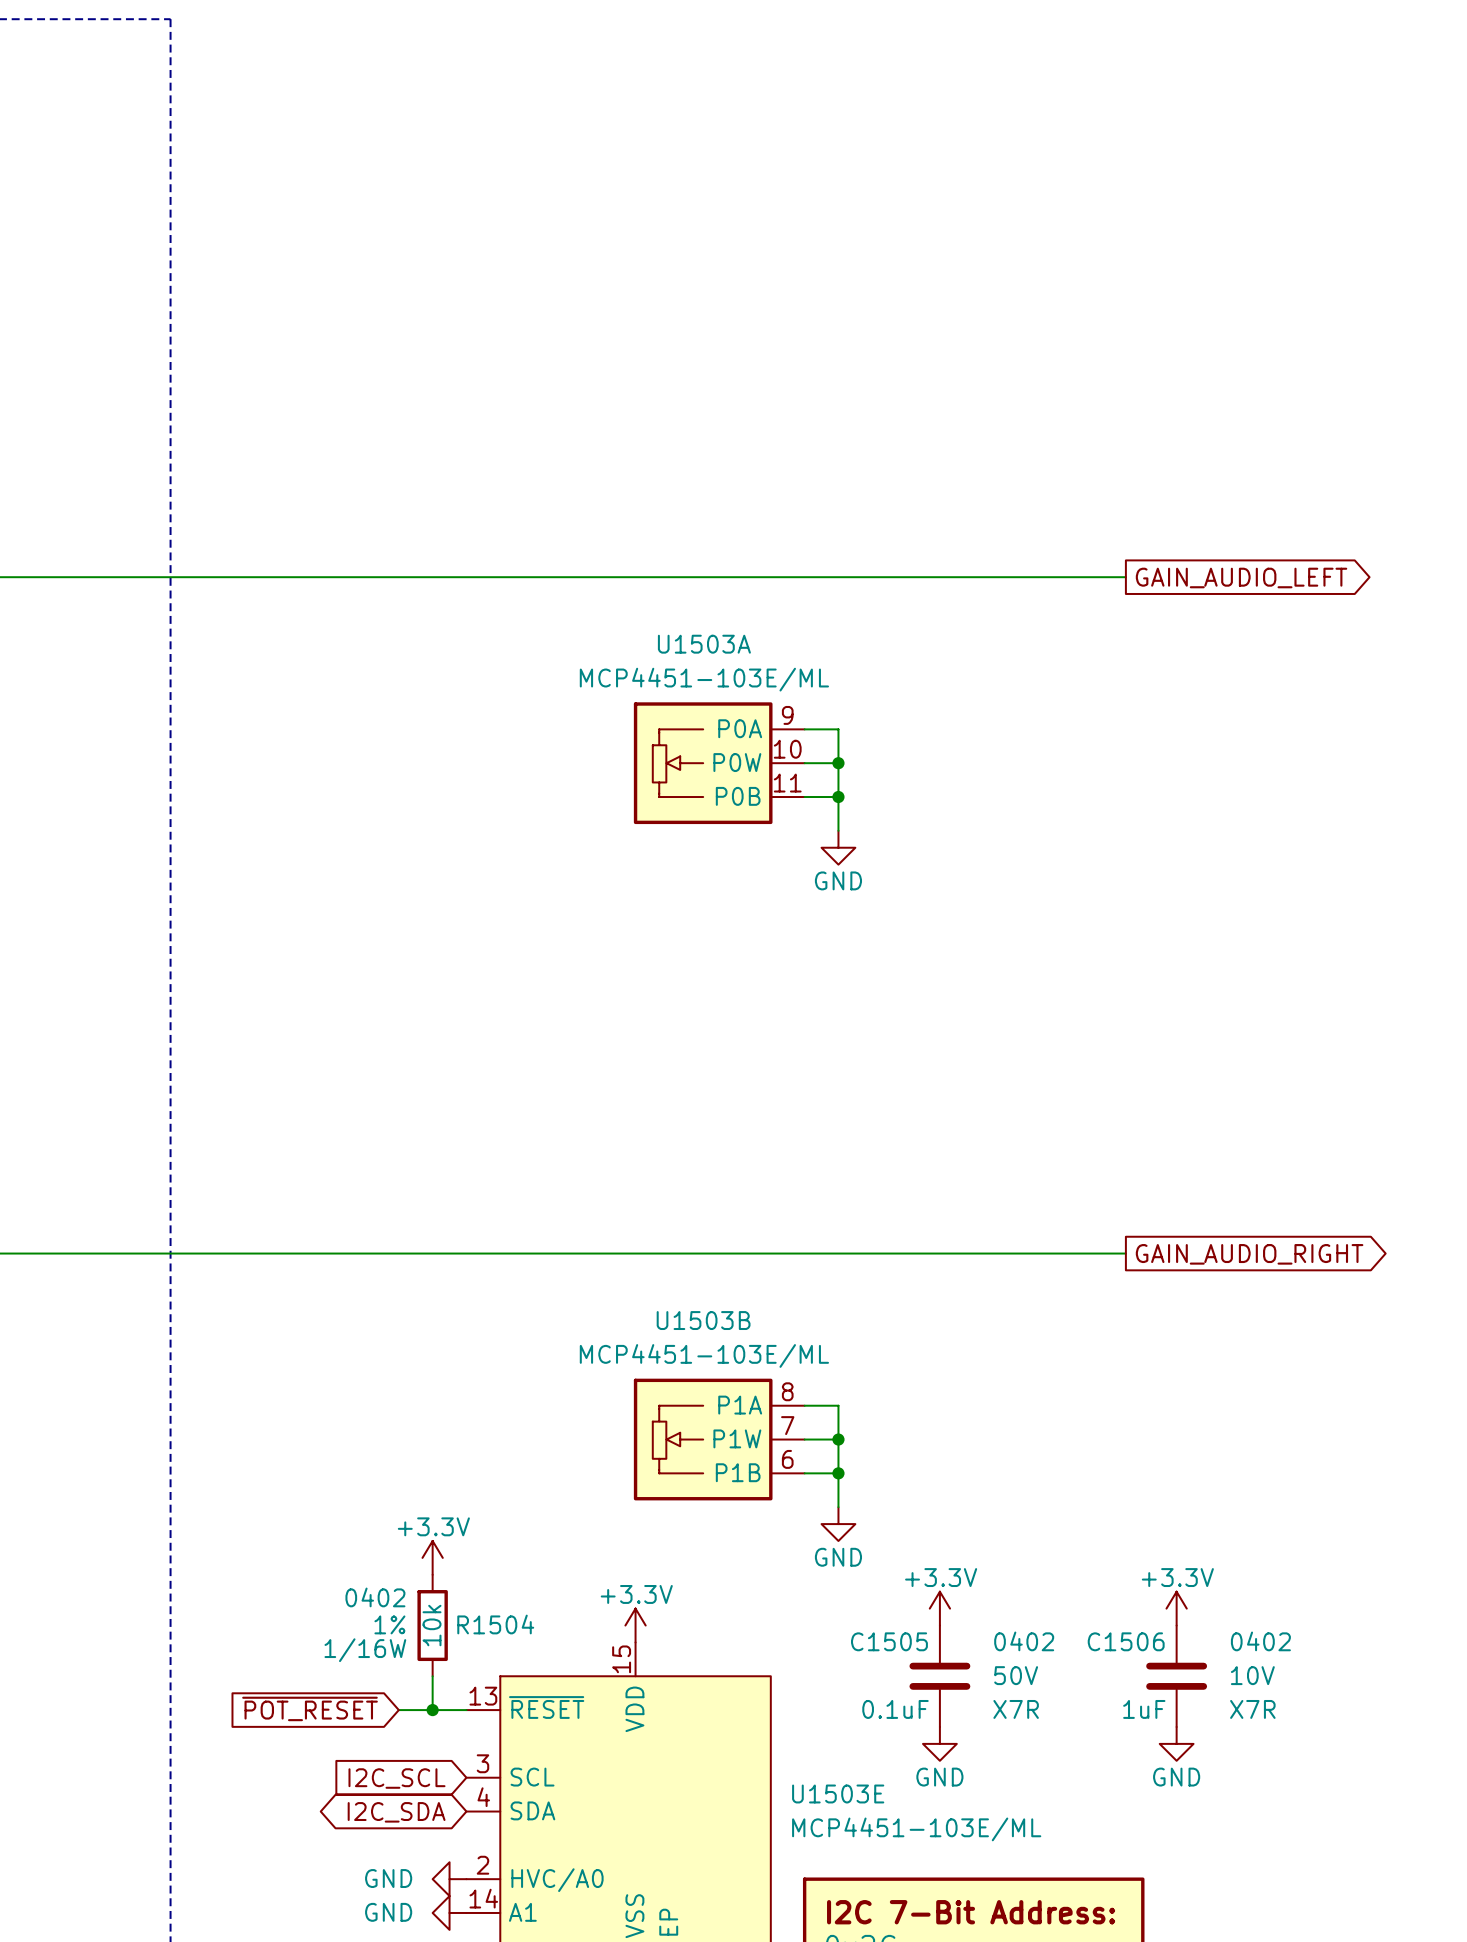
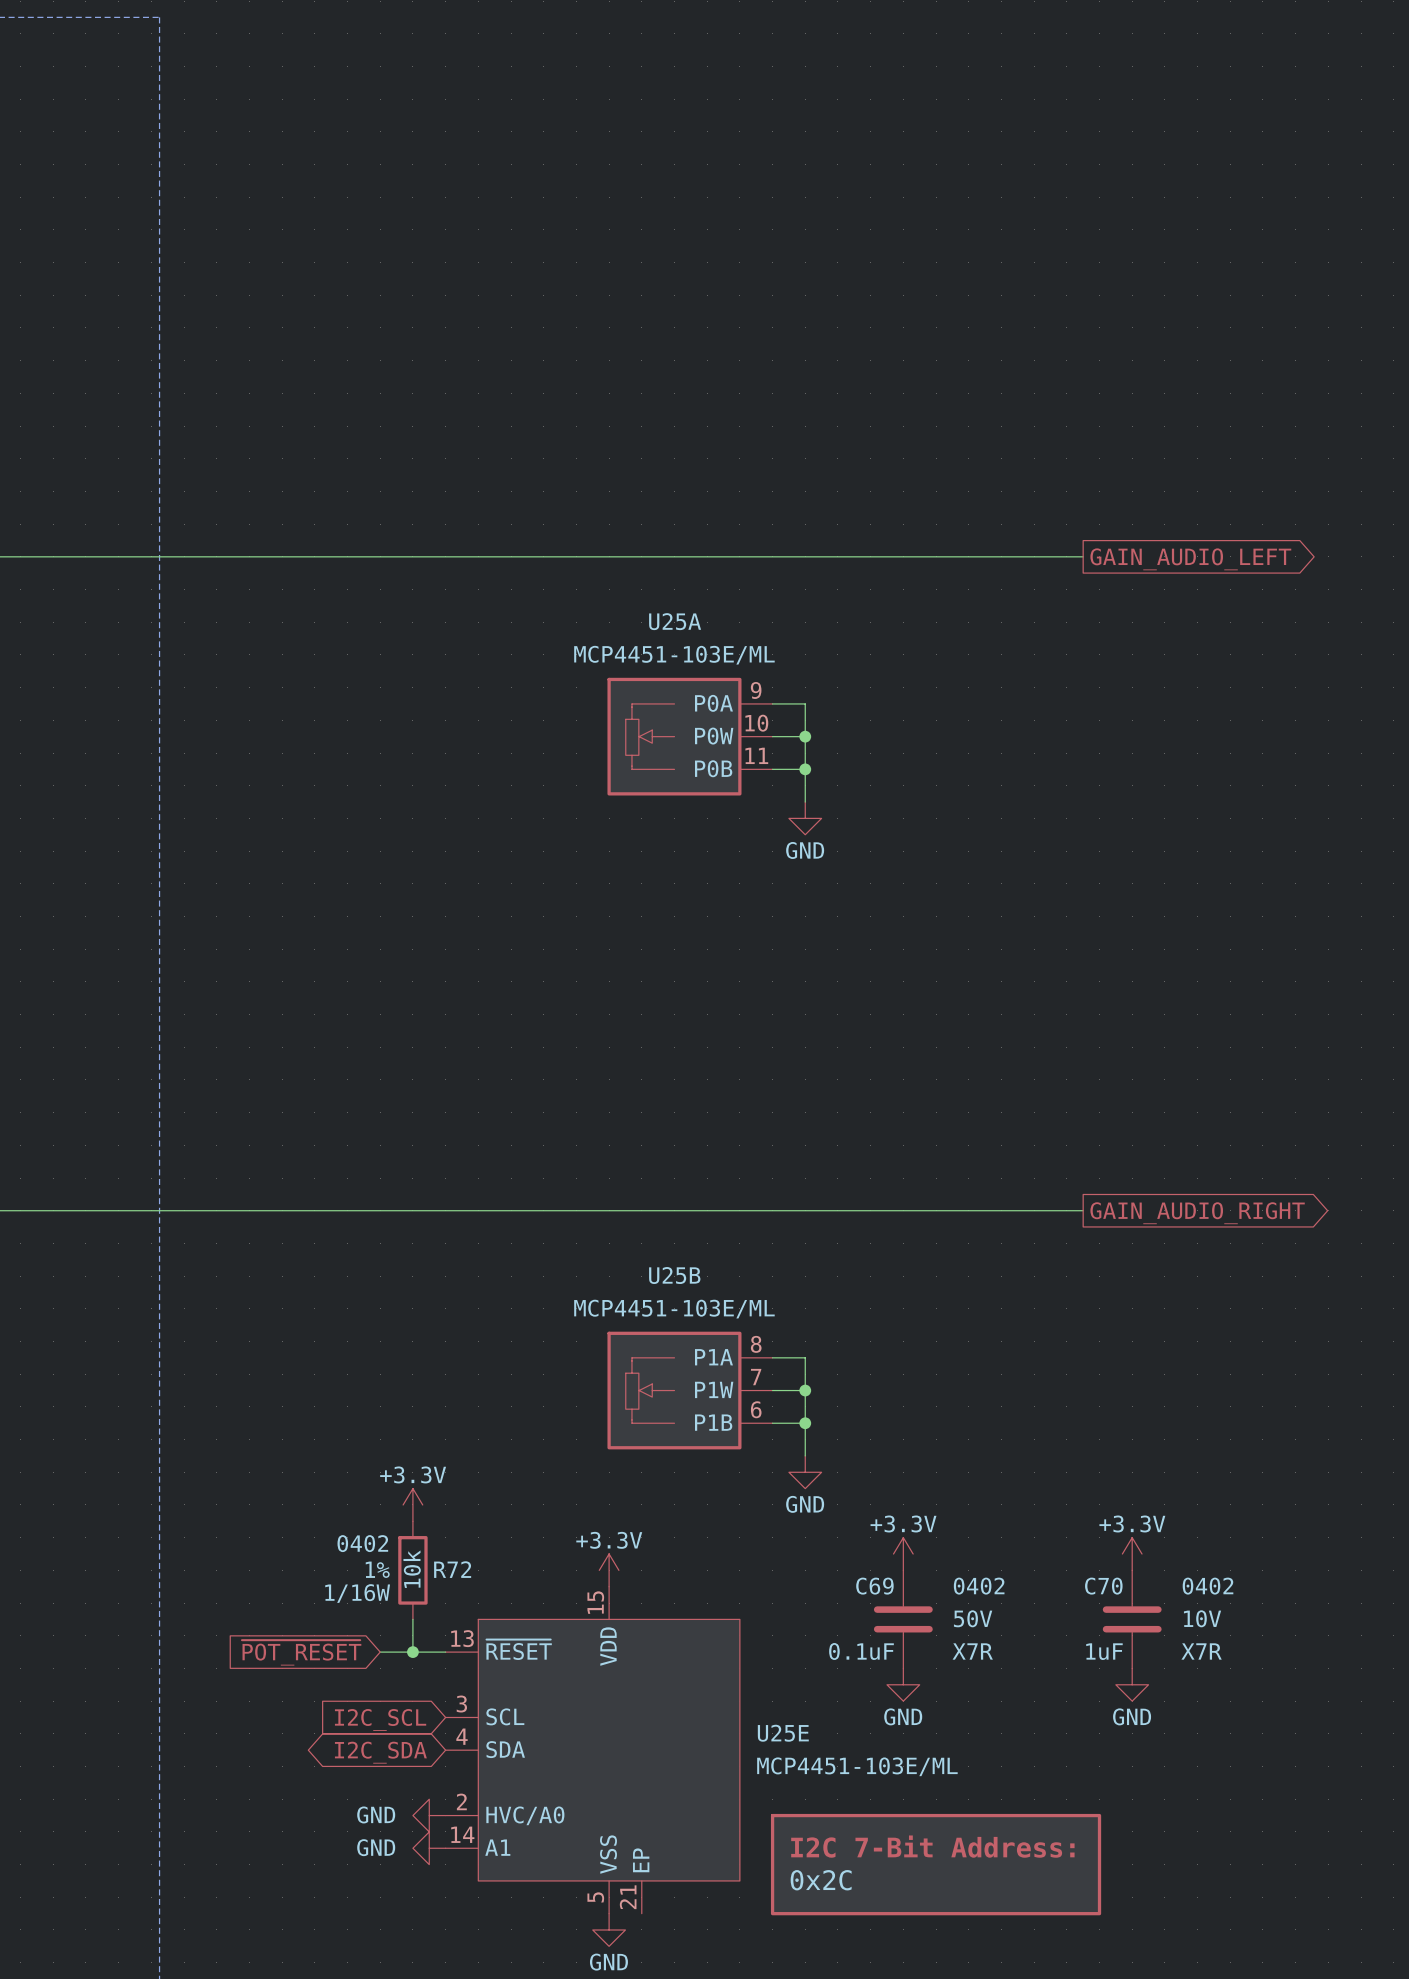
U1503A name: U1503A (704, 644) -> U25A (675, 621)
U1503B name: U1503B (703, 1320) -> U25B (674, 1275)
R1504 name: R1504 (495, 1624) -> R72 (452, 1569)
C1505 name: C1505 (889, 1641) -> C69 (874, 1586)
C1506 name: C1506 (1126, 1641) -> C70 (1103, 1586)
U1503E name: U1503E (838, 1793) -> U25E (783, 1733)

